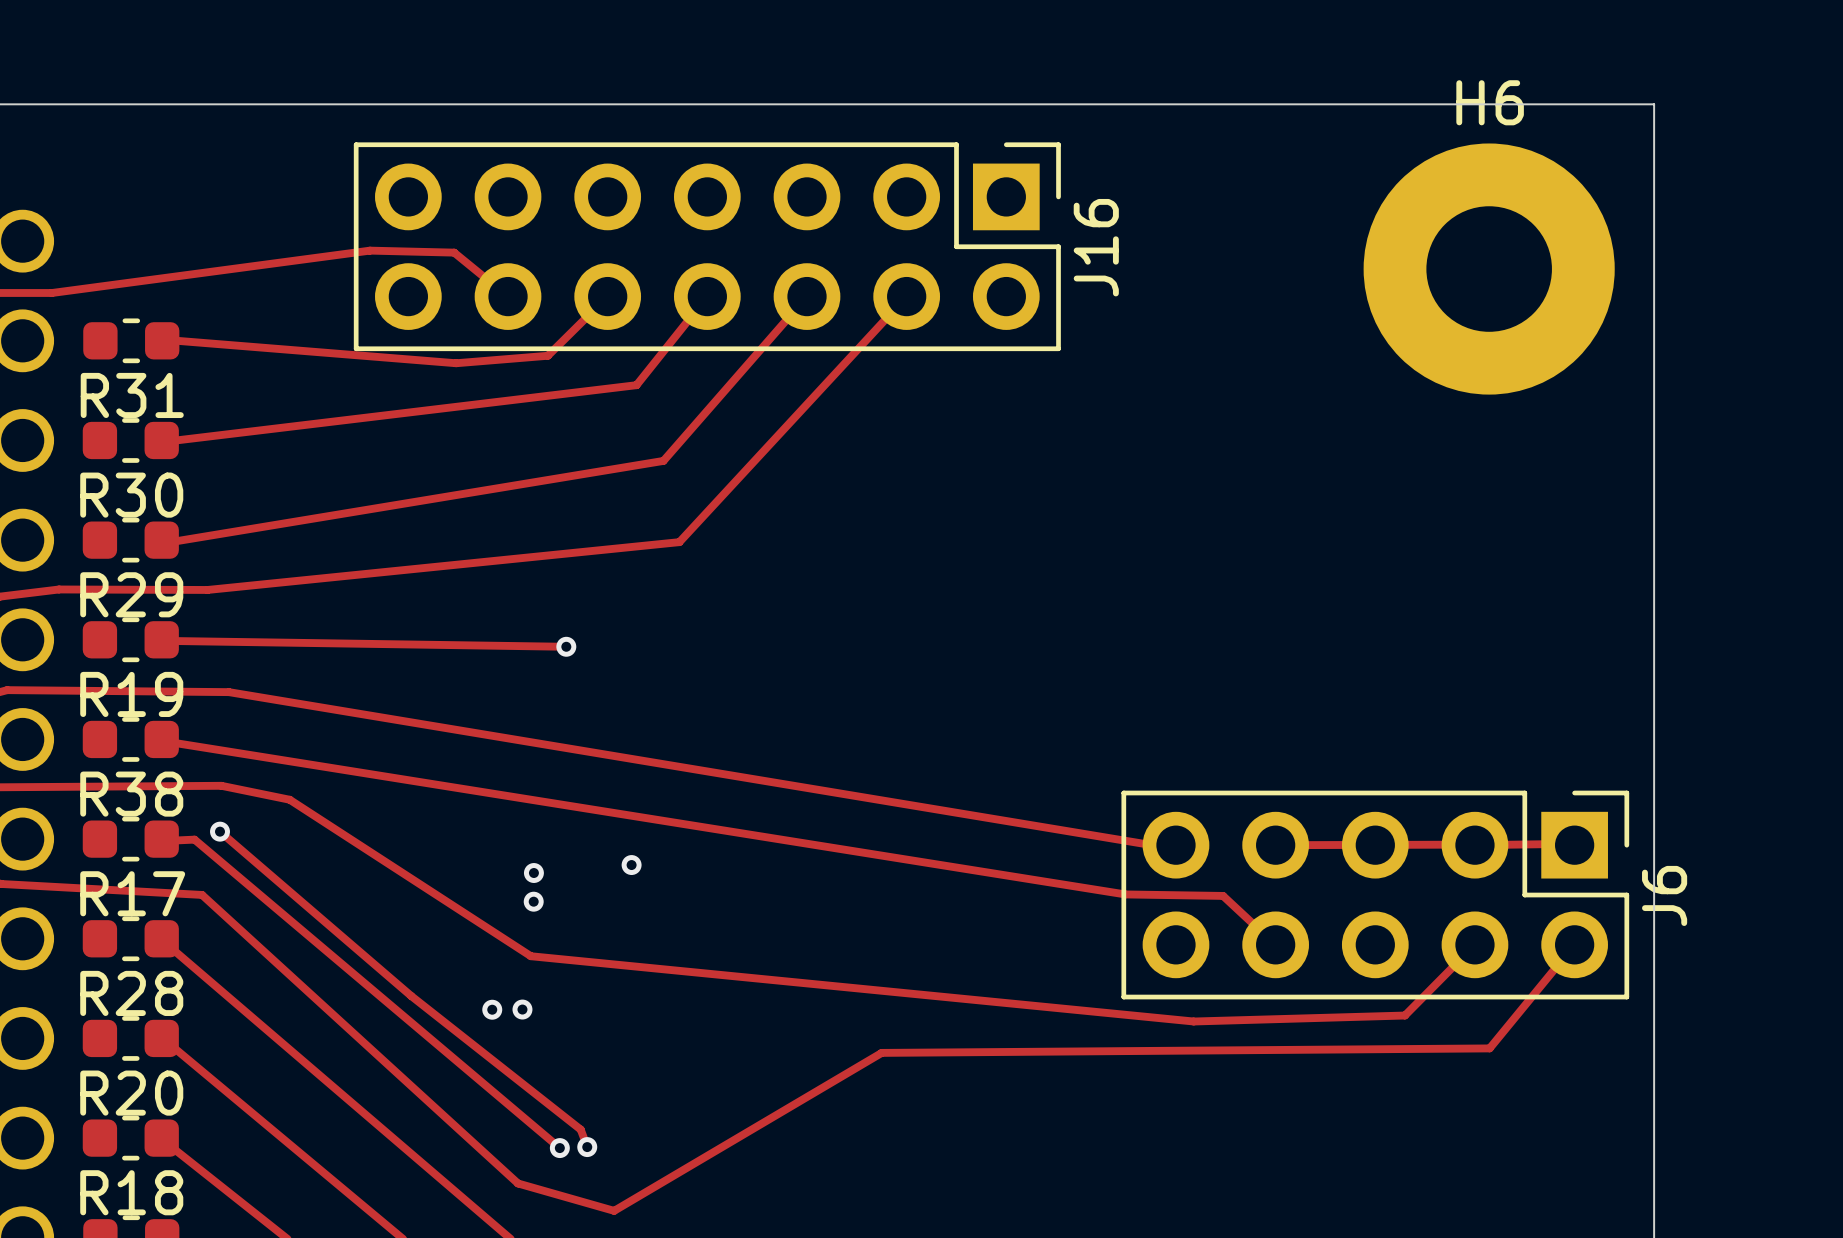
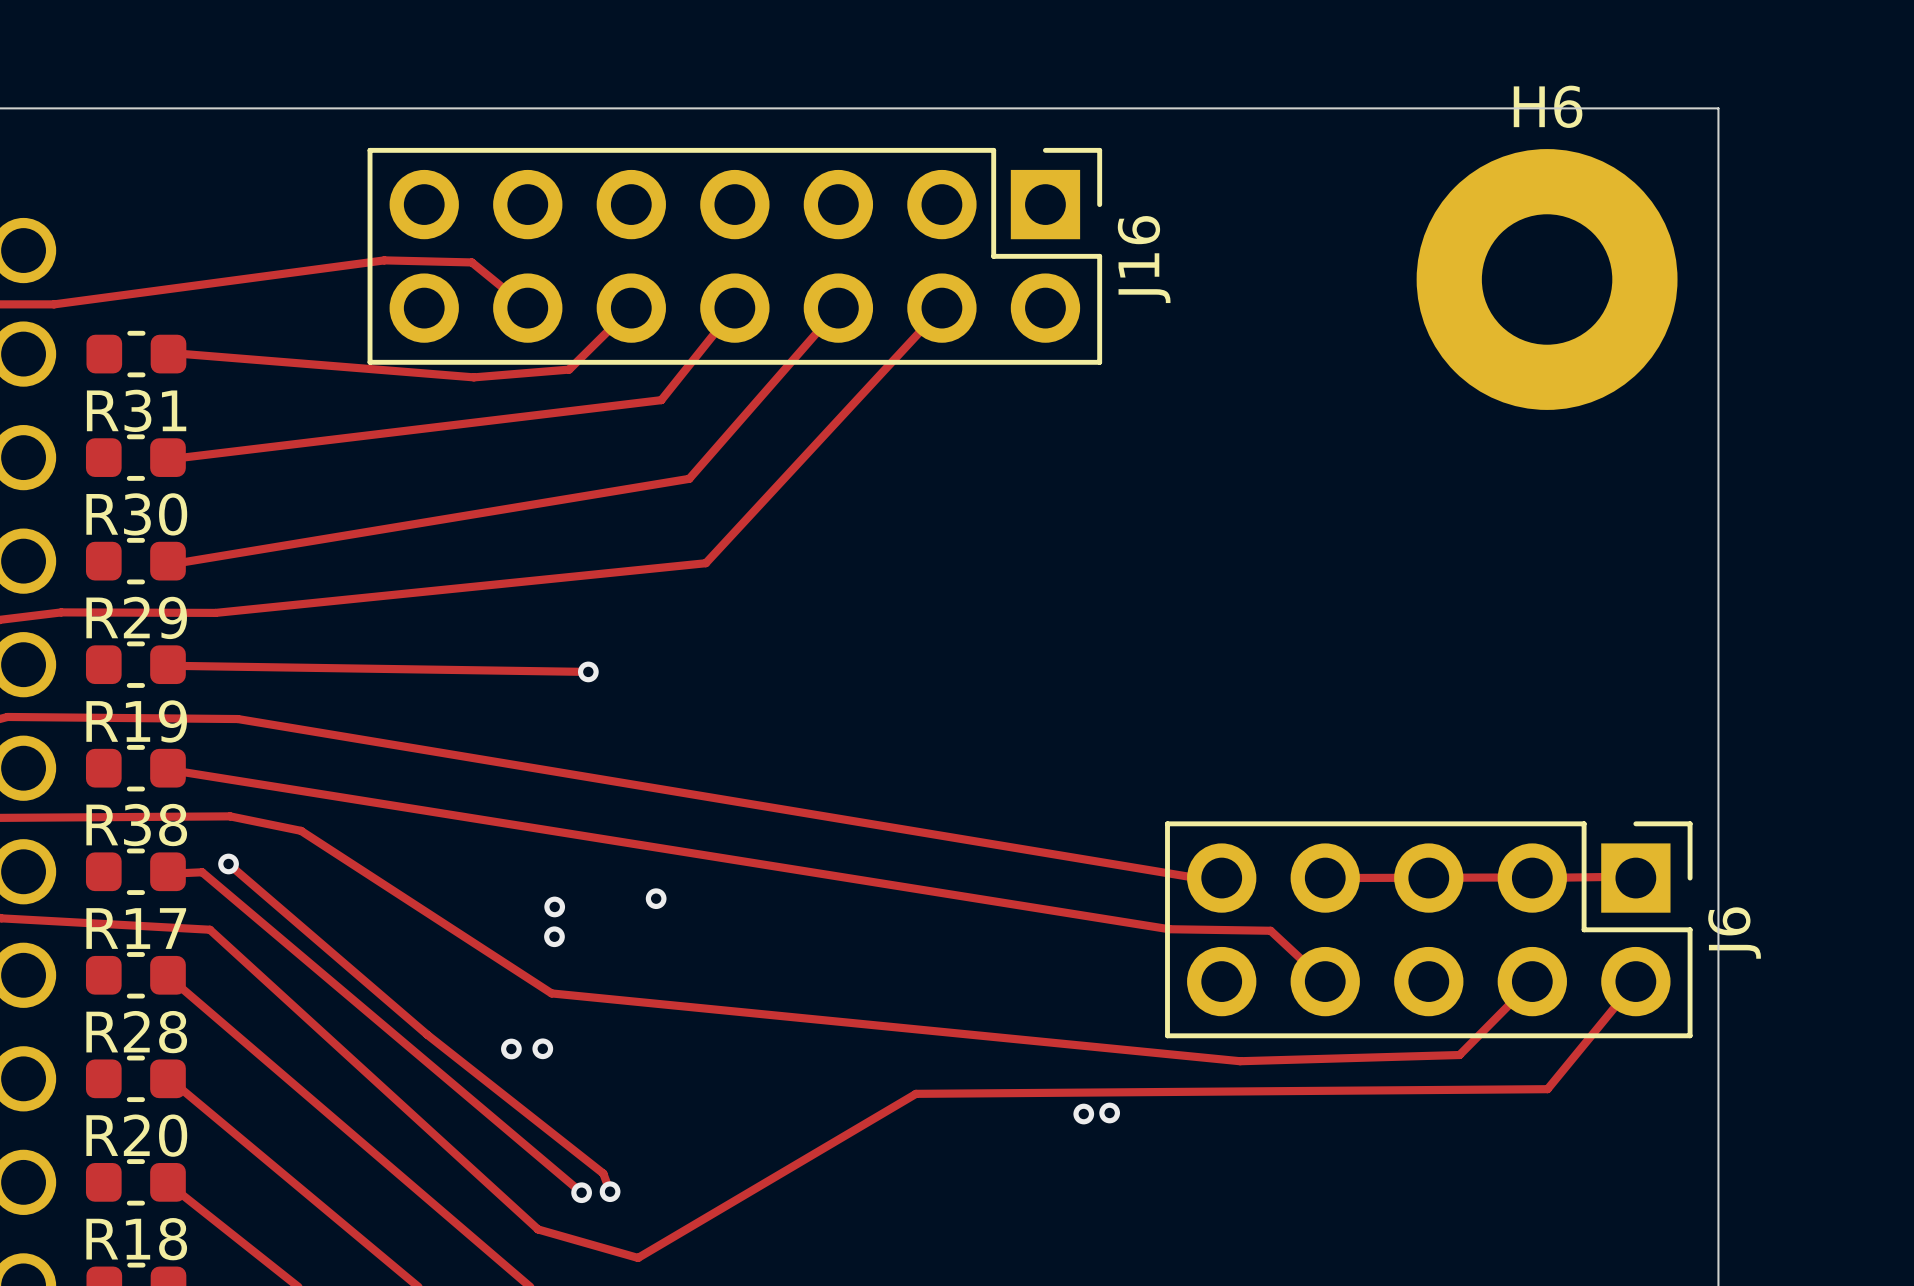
via: none -> (1109, 1112)
via: none -> (1083, 1114)

